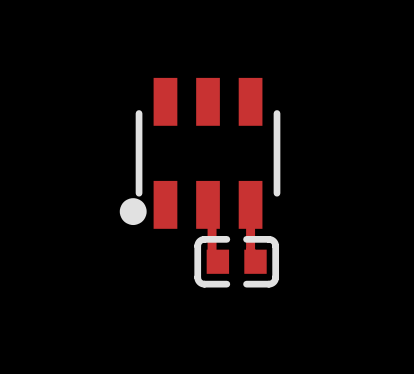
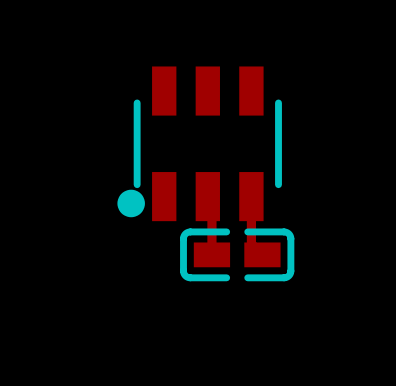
part footprint: [194, 236, 280, 288] -> [180, 228, 295, 282]

